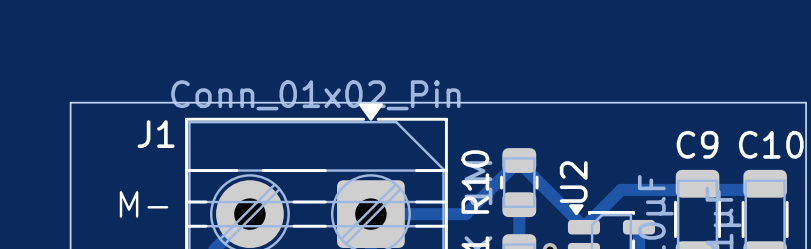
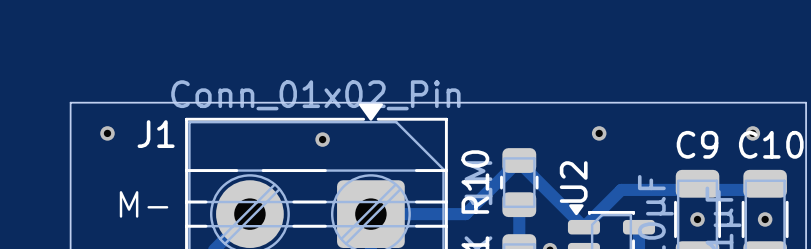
via: none -> (107, 133)
via: none -> (599, 133)
via: none -> (752, 133)
via: none -> (322, 139)
via: none -> (697, 219)
via: none -> (765, 219)

